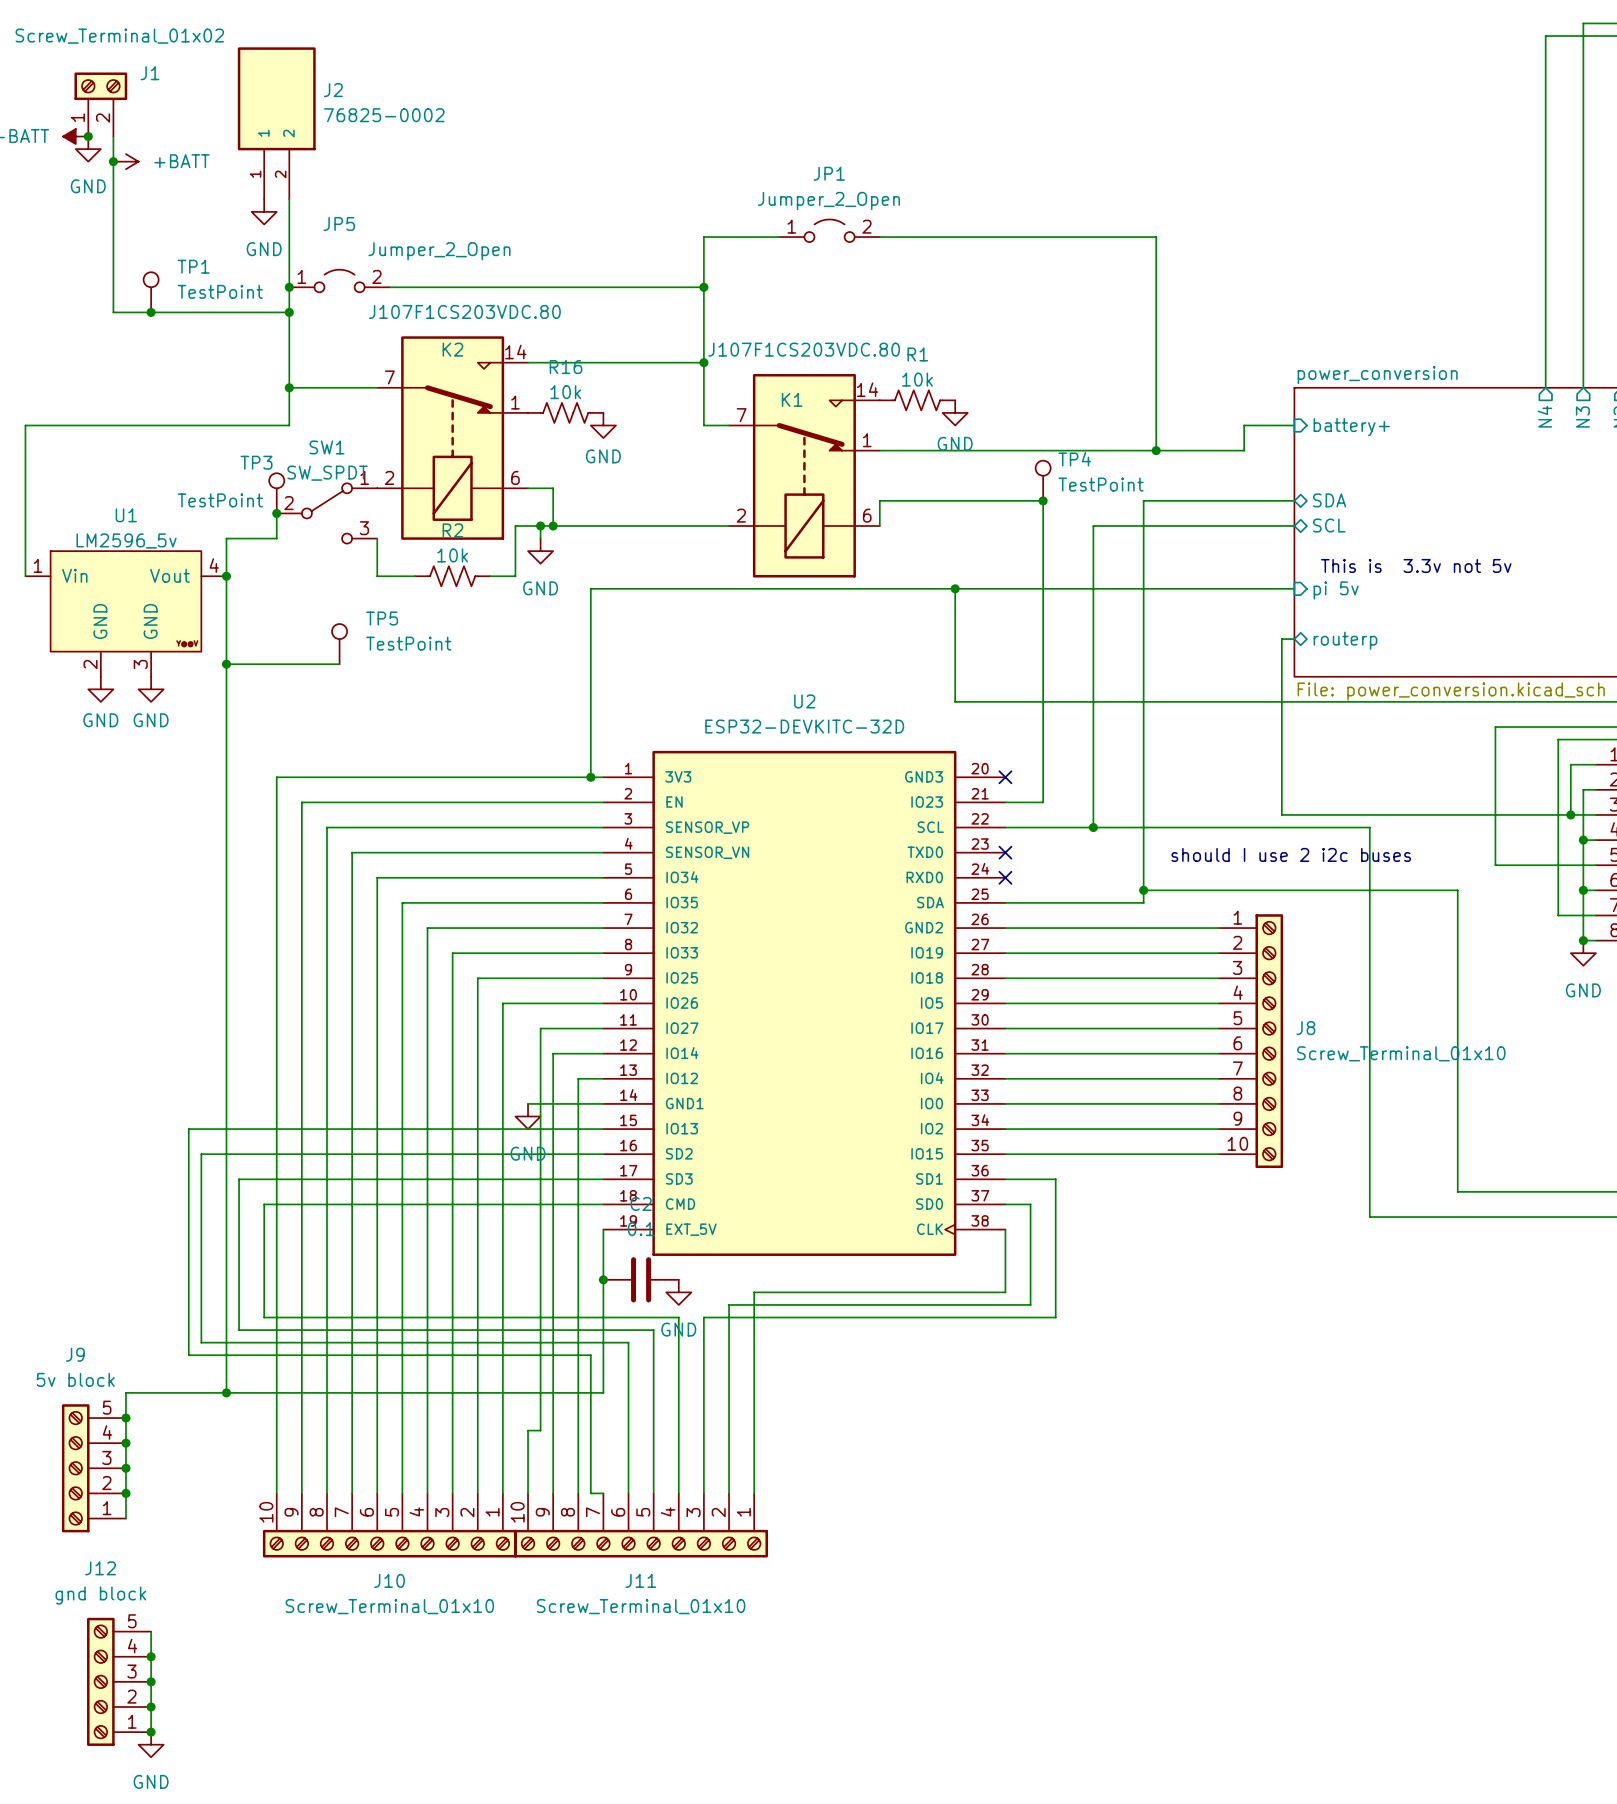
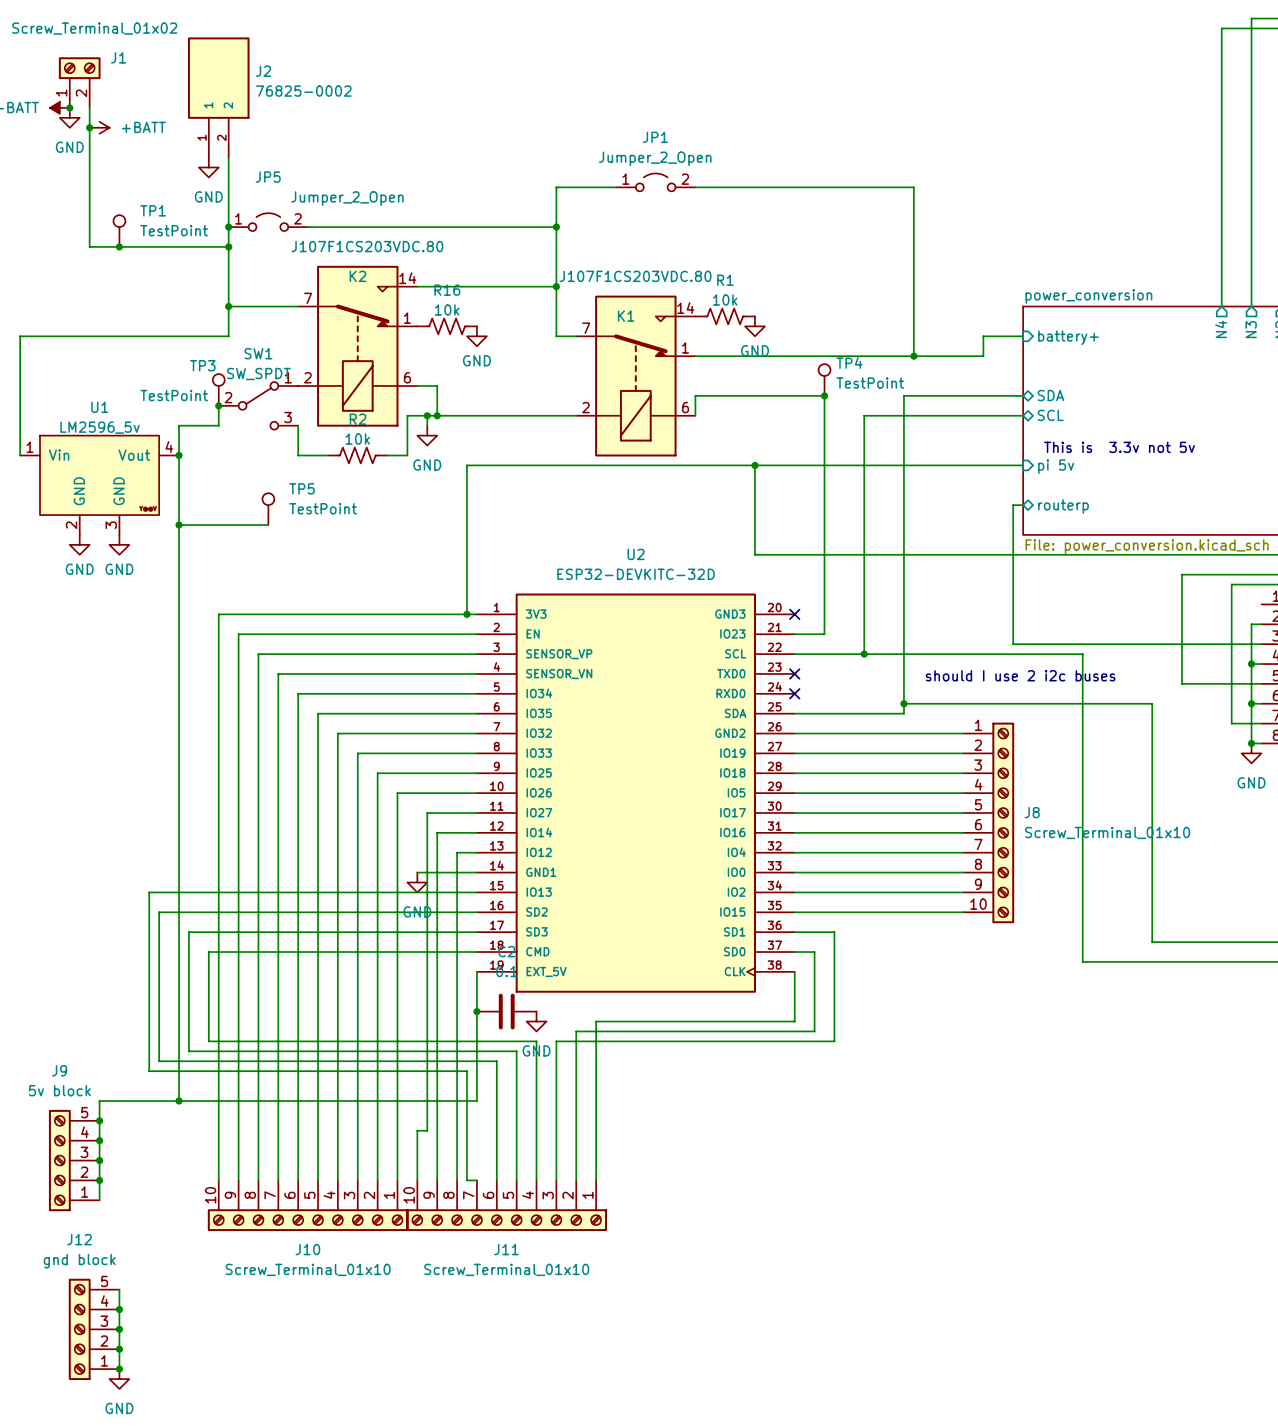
wire: (1595, 764) (1570, 764) (1570, 814) -> none
junction: (1570, 814) -> none

